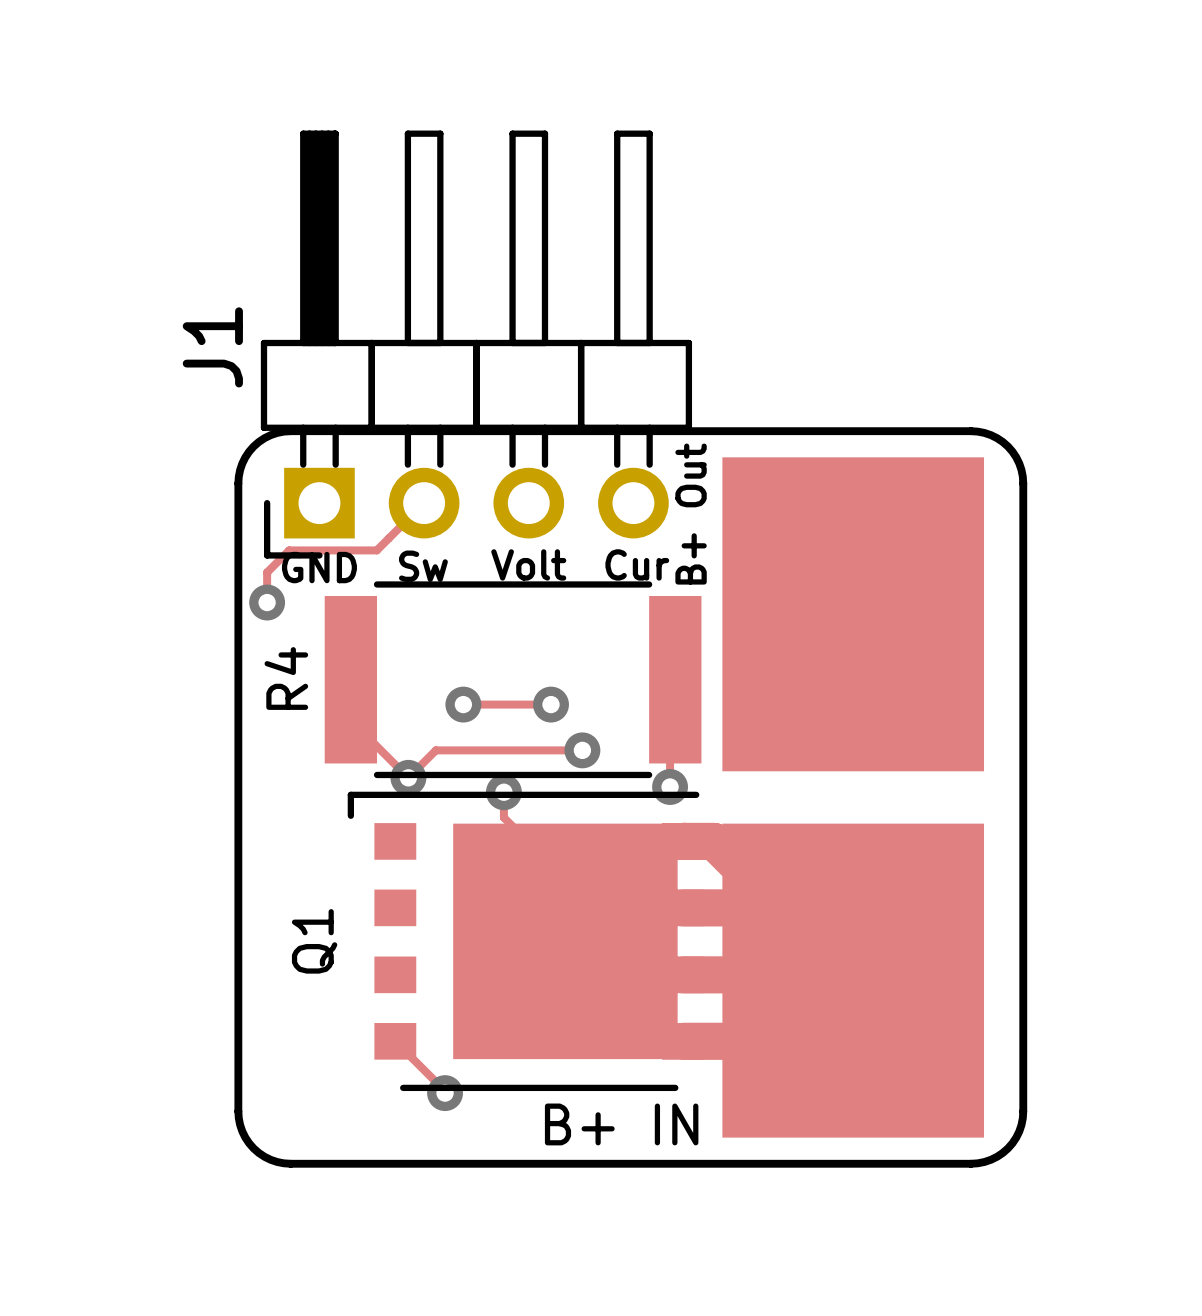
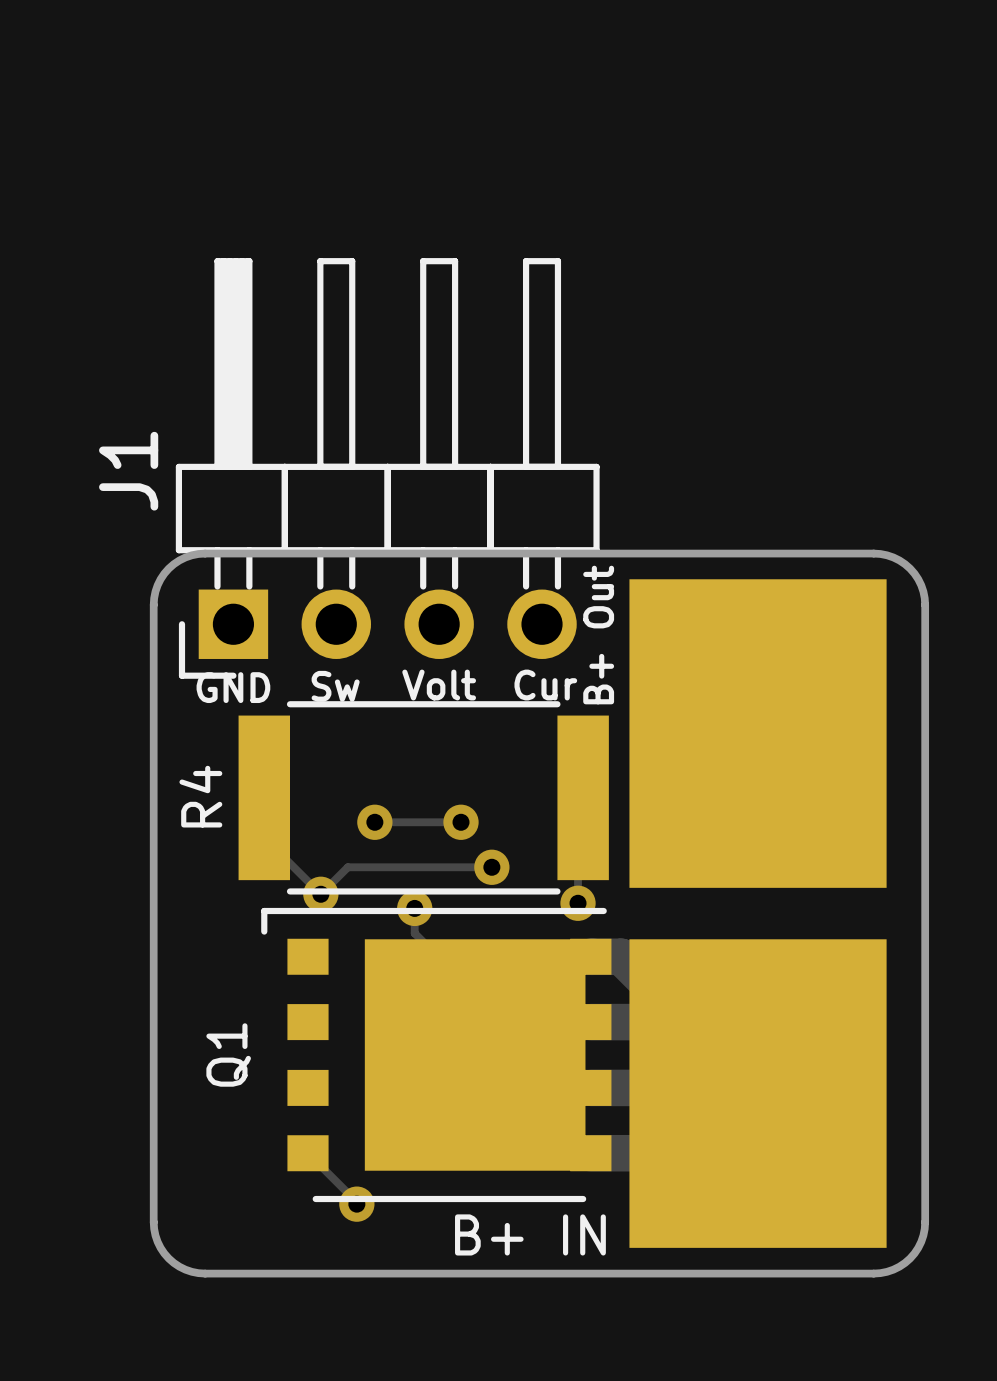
track: (424, 503) (376, 550) (289, 550) (267, 572) (267, 602) -> none
via: (267, 602) -> none

